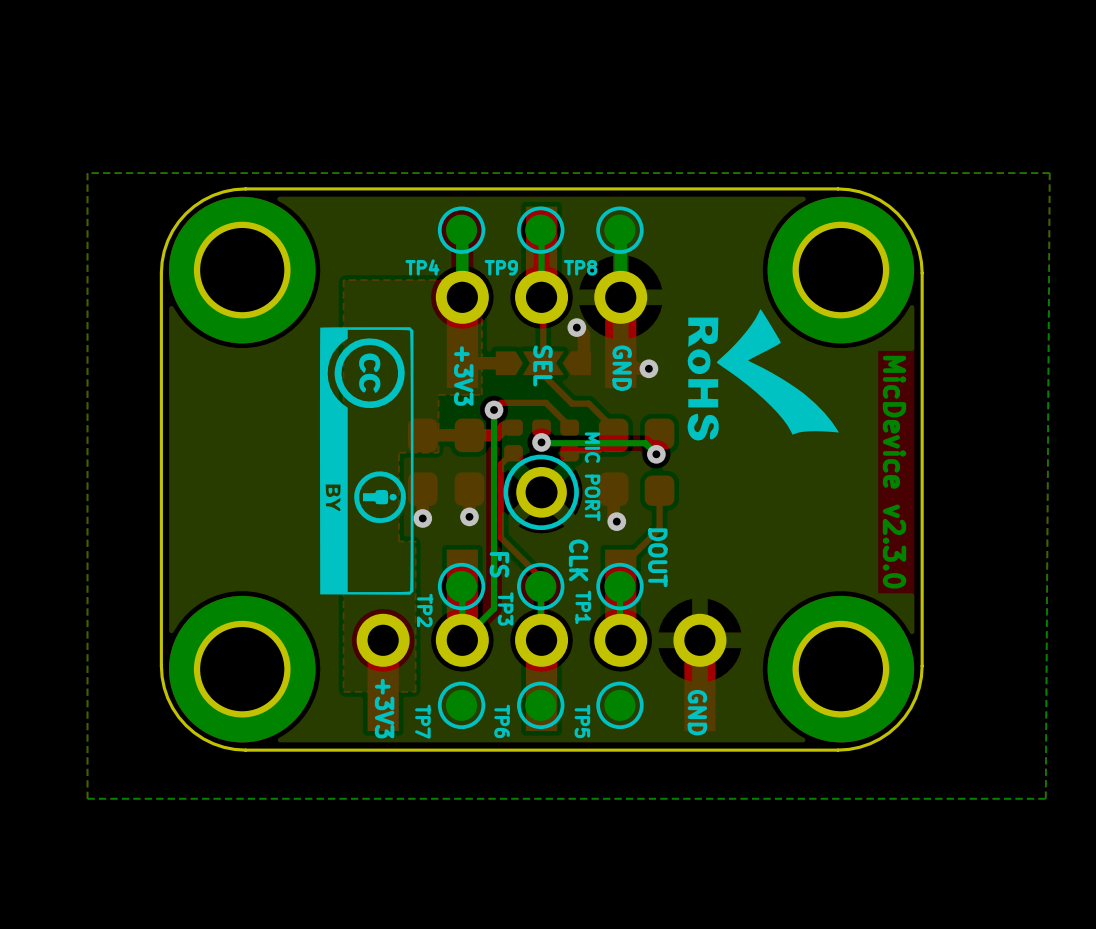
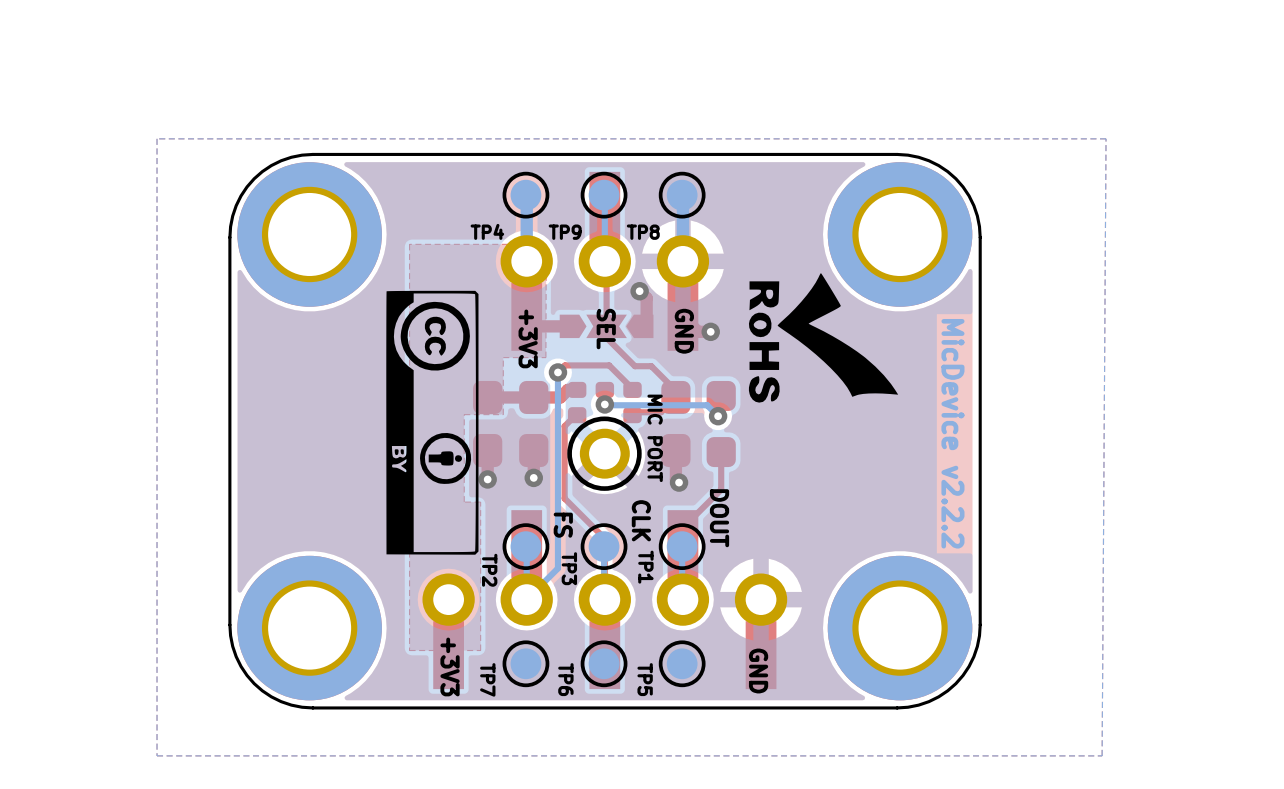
text: MicDevice v2.3.0 (894, 472) -> MicDevice v2.2.2 (952, 433)

